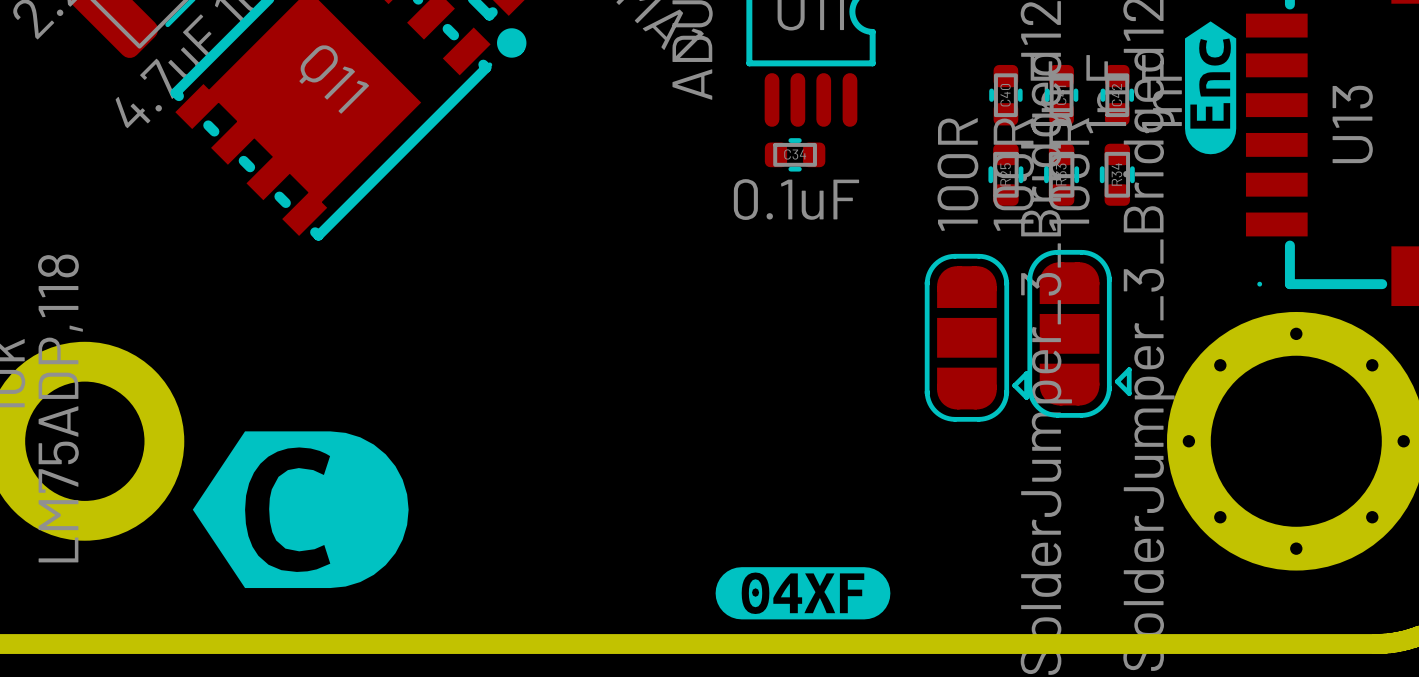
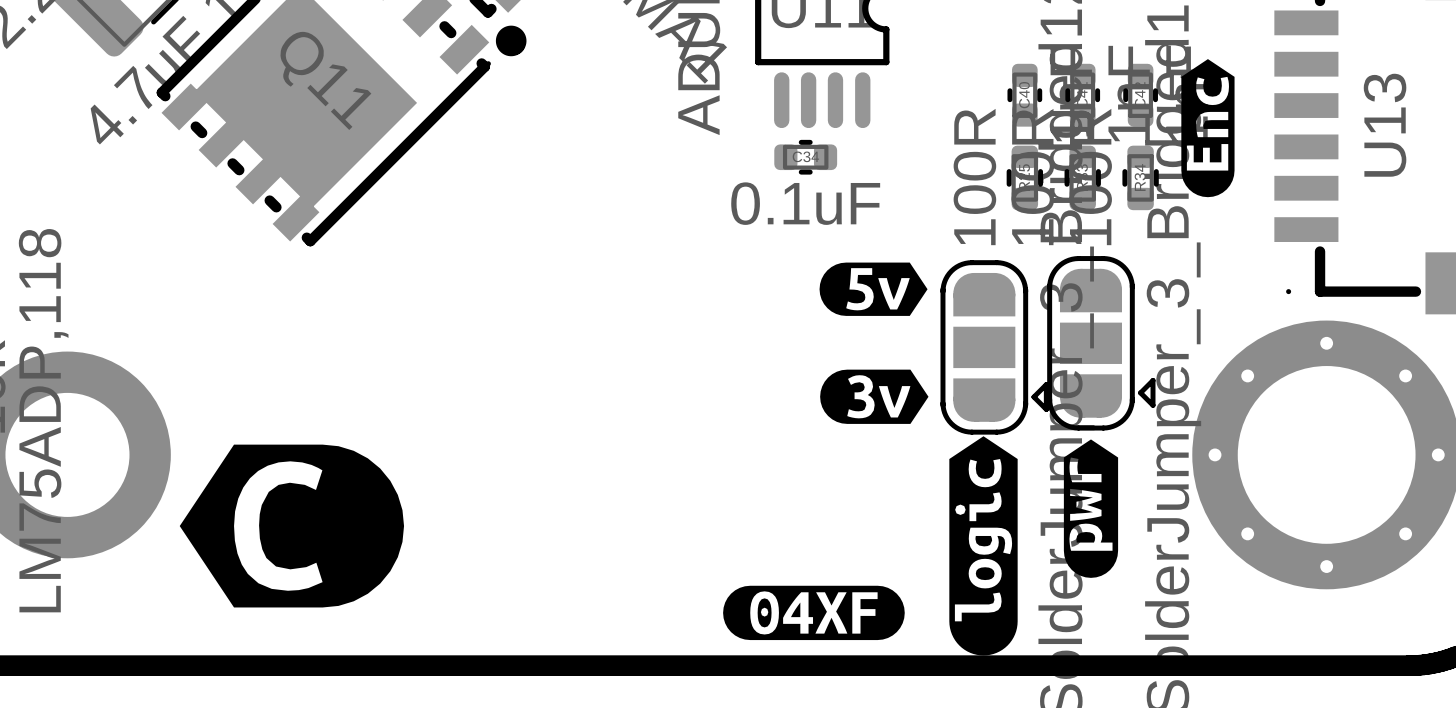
drawing position: (1210, 87) -> (1207, 128)
drawing: none -> [819, 262, 928, 316]
drawing: none -> [820, 369, 1119, 656]

